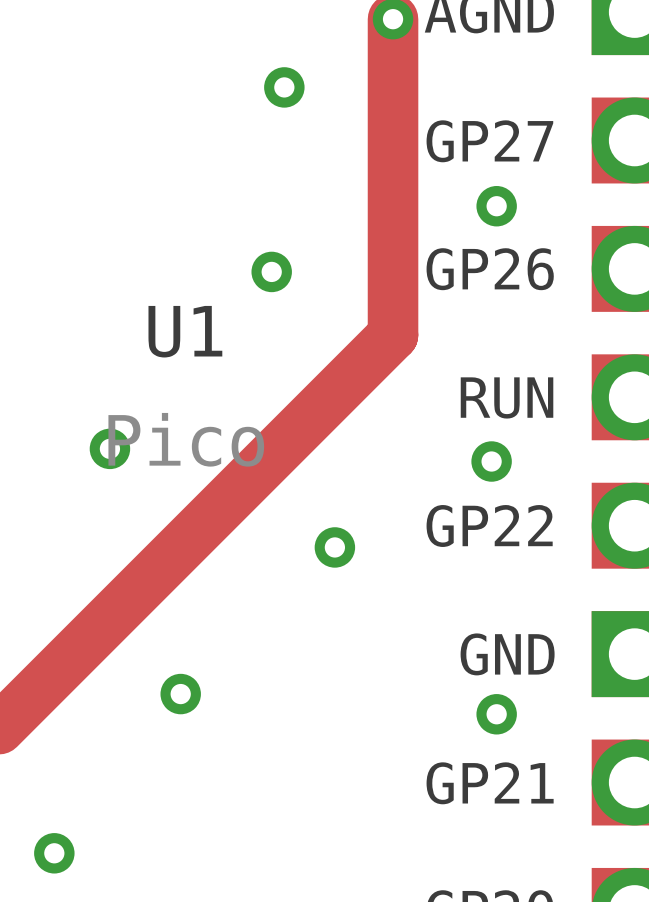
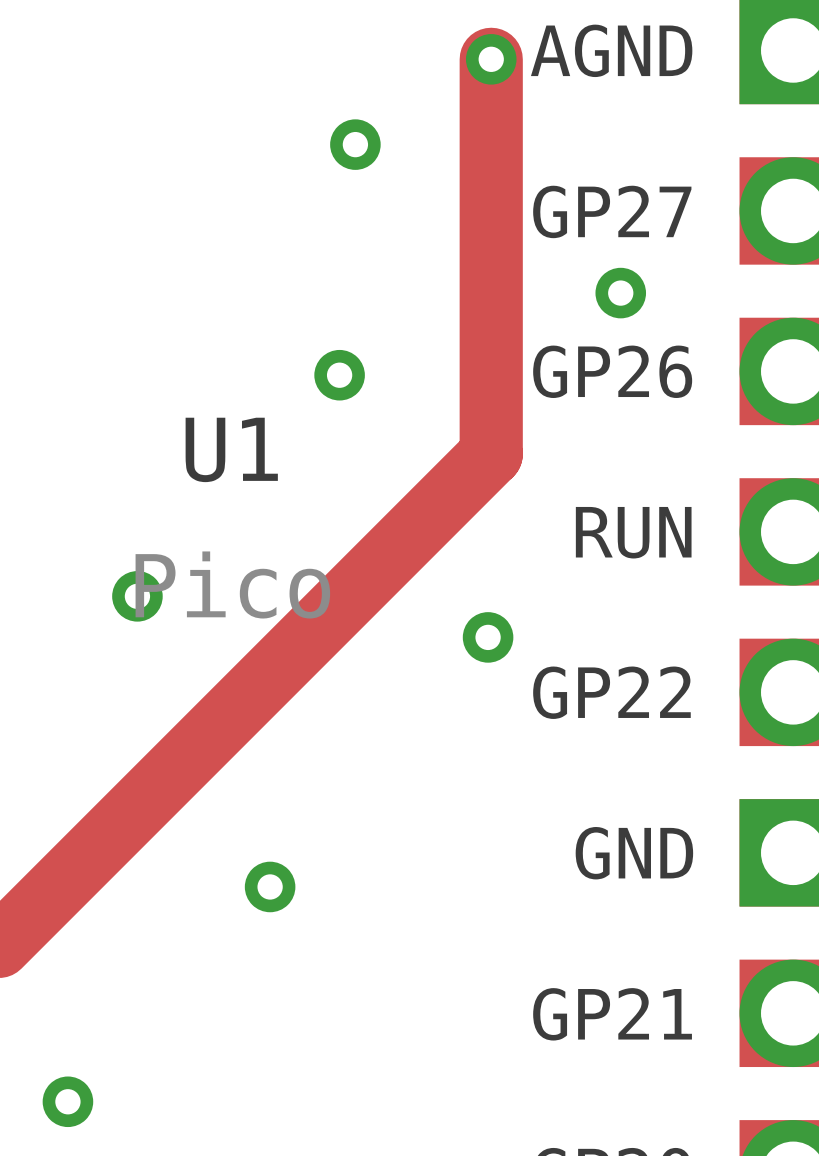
via: (491, 461) -> none
via: none -> (488, 637)
via: (334, 547) -> none
via position: (180, 694) -> (270, 886)
via: (496, 714) -> none

